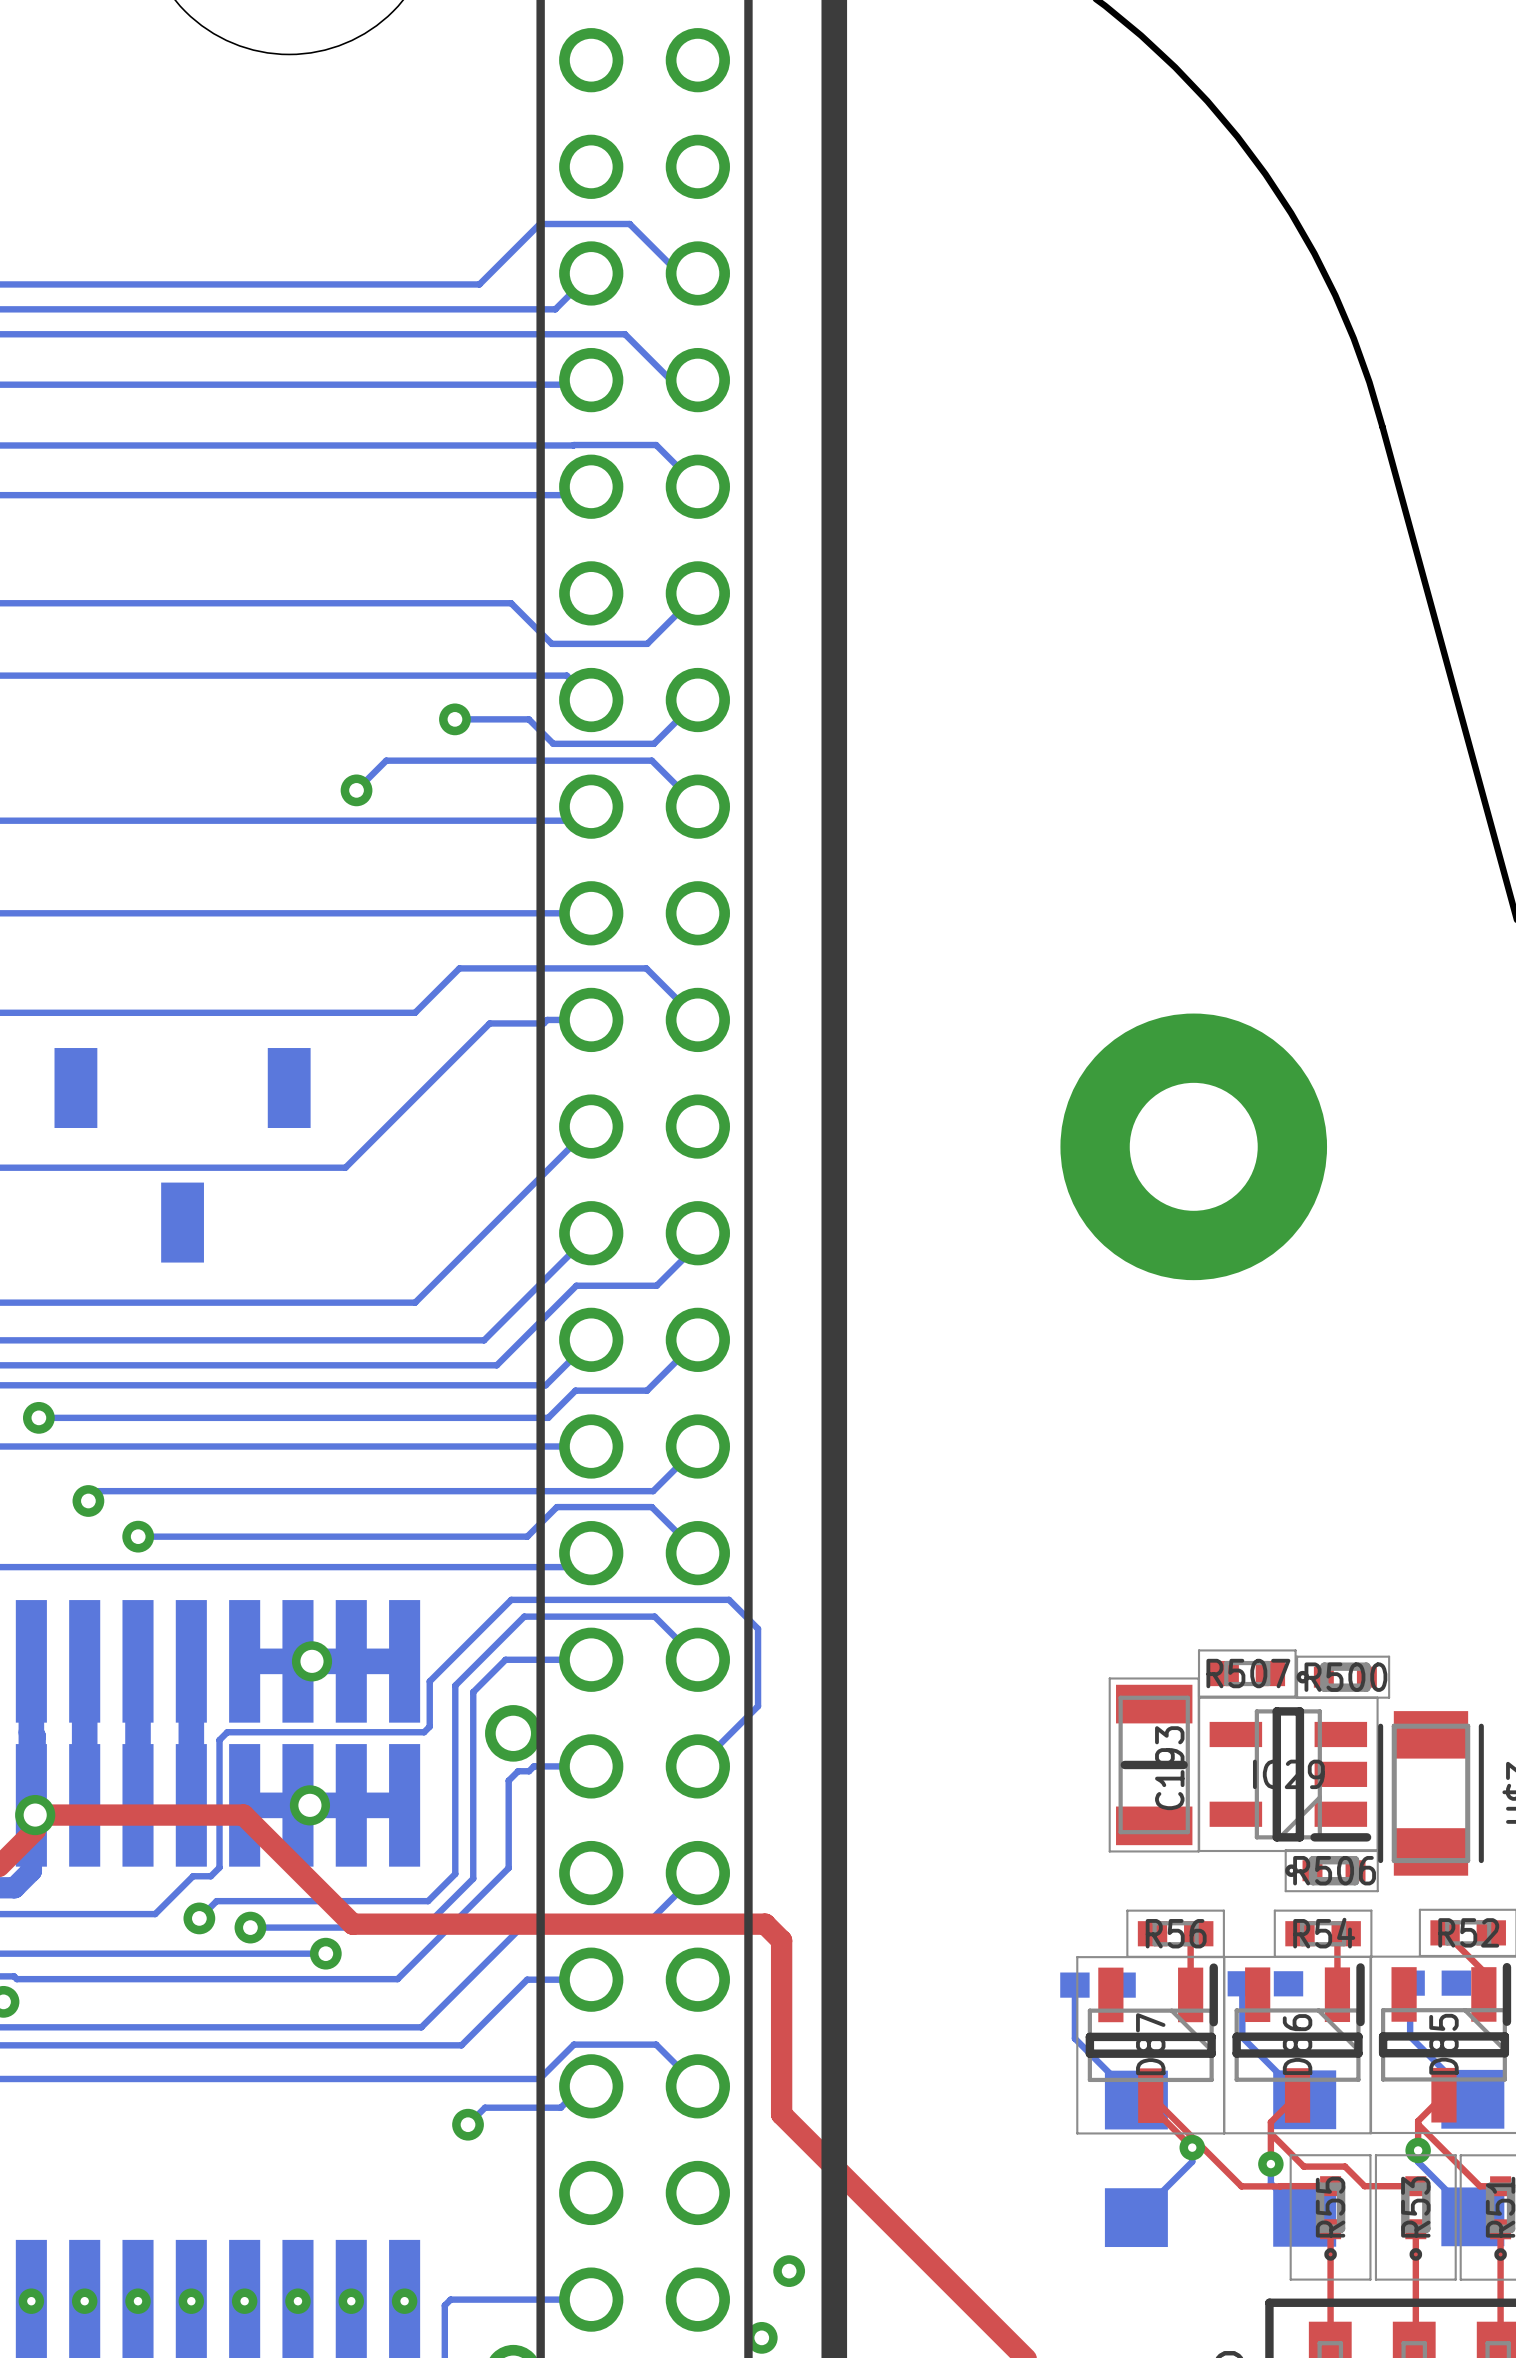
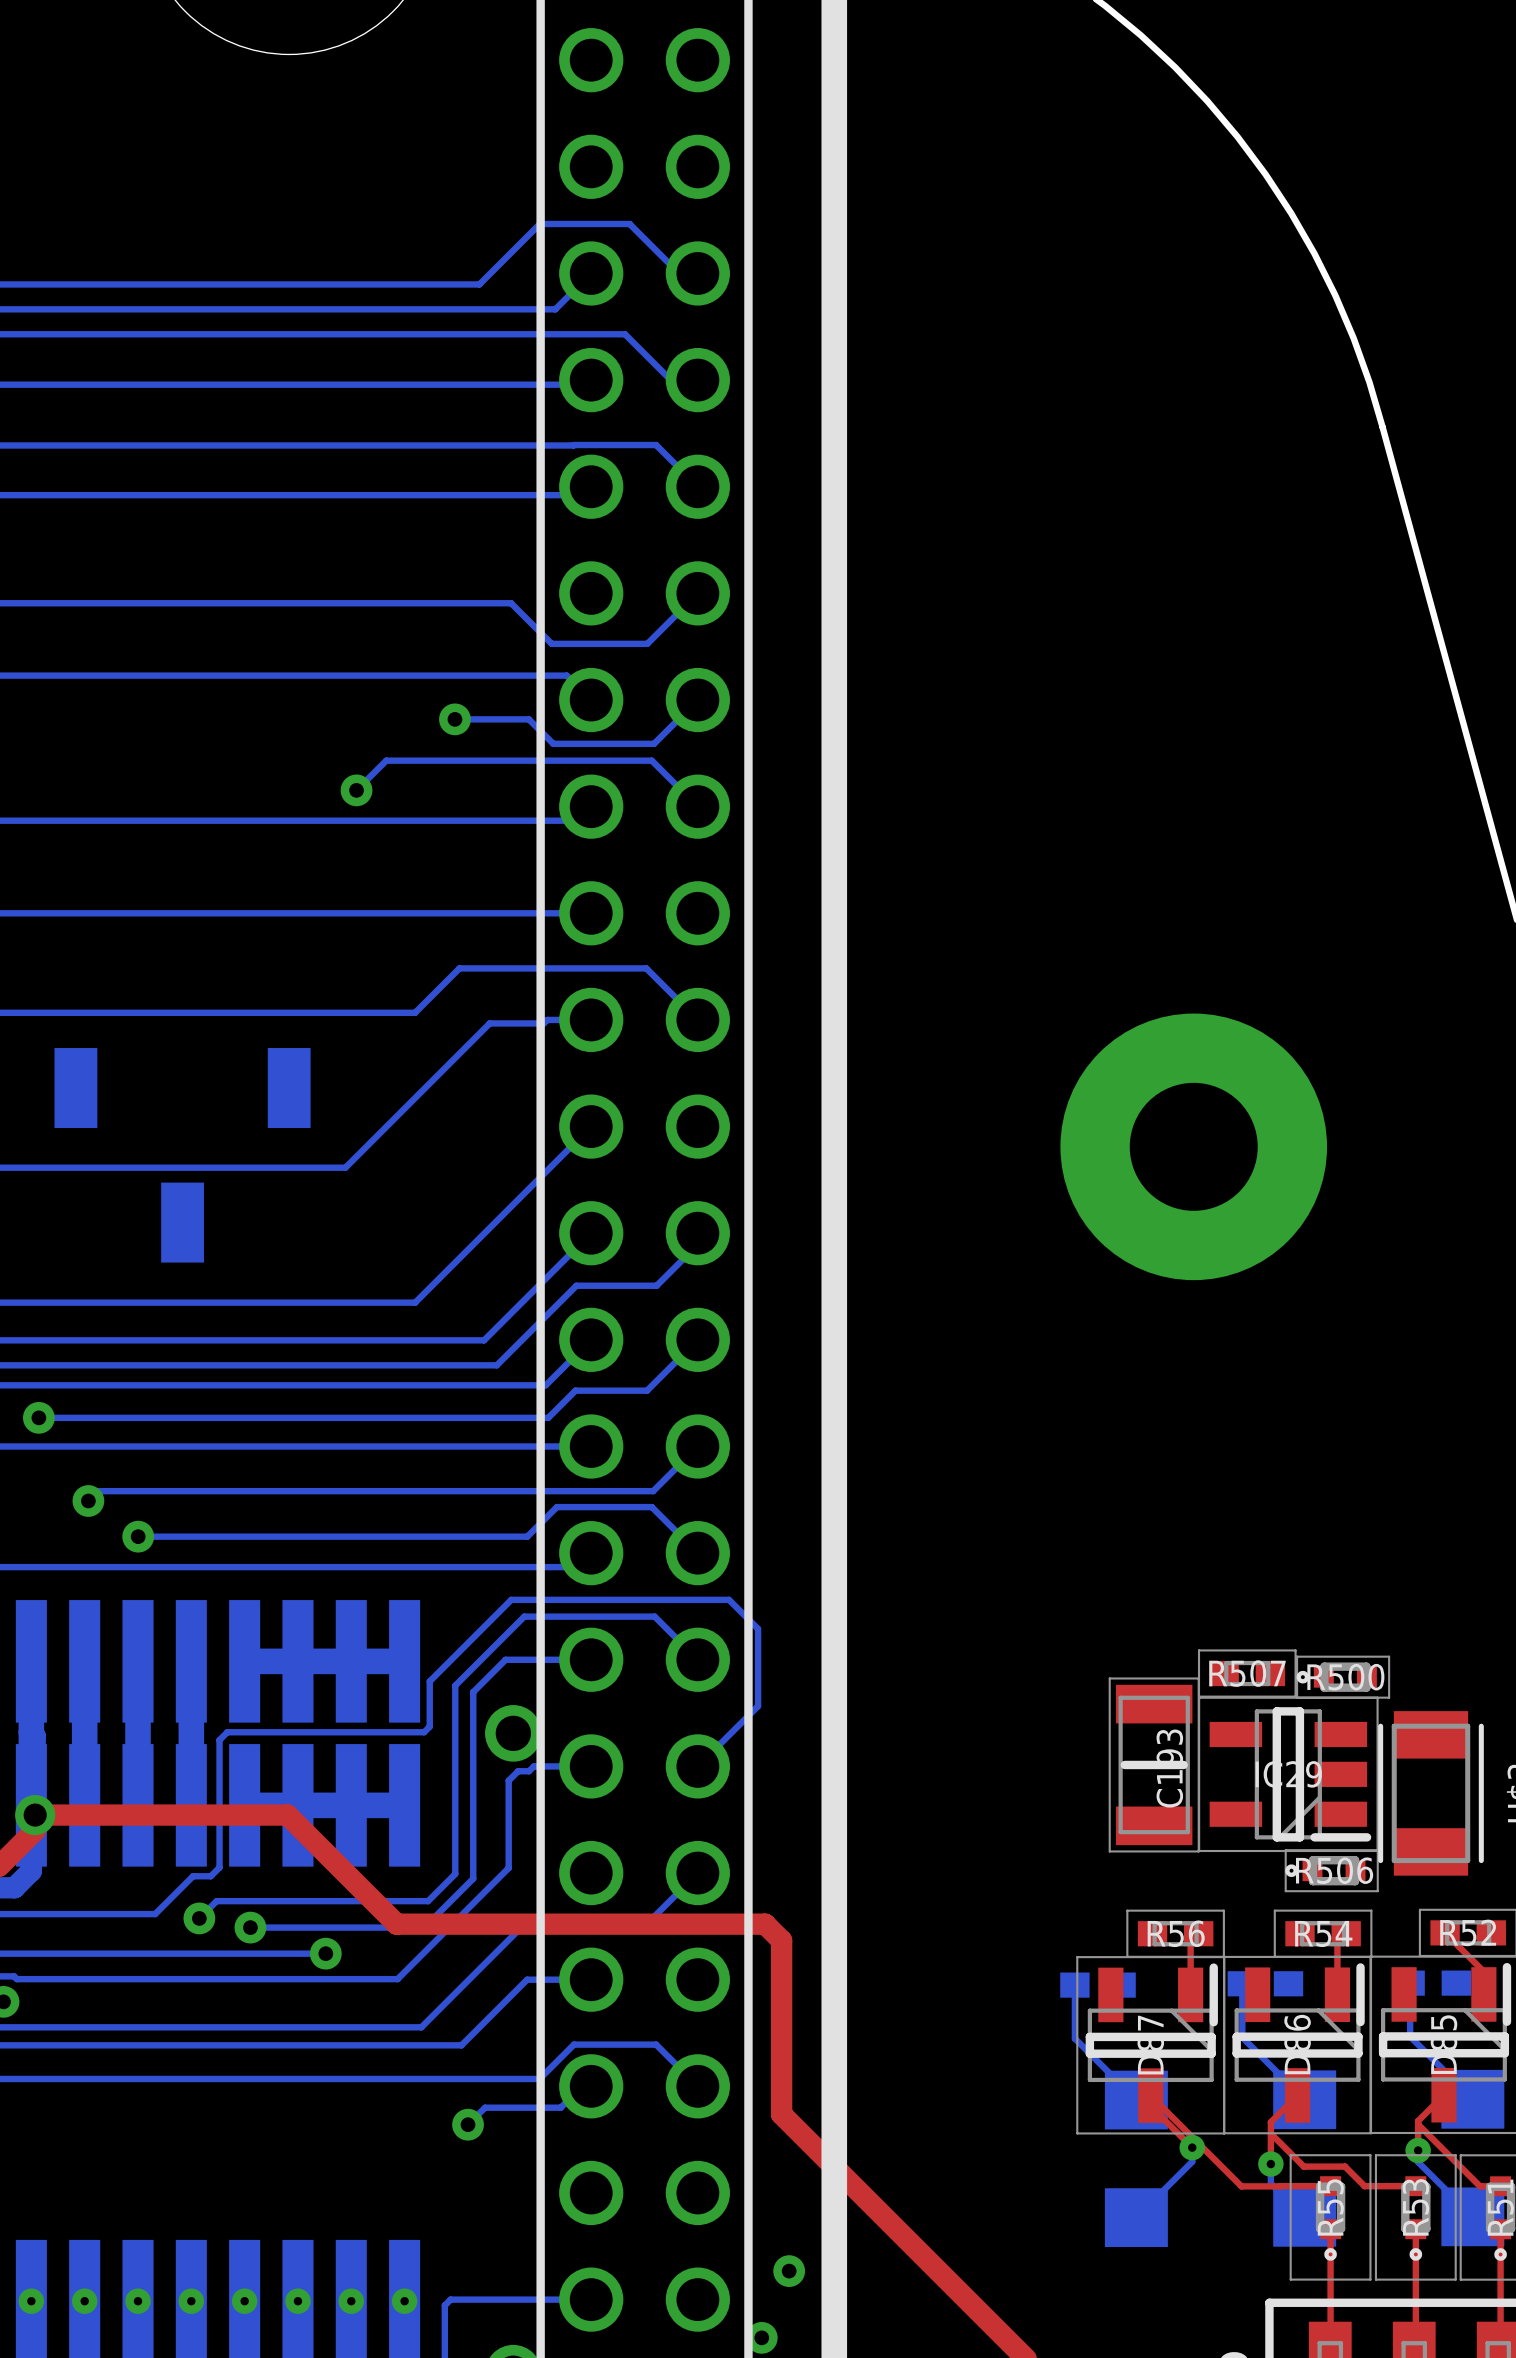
via: (312, 1661) -> none
via: (309, 1805) -> none
top track: (243, 1815) (352, 1924) (396, 1924) -> (243, 1815) (287, 1815) (396, 1924)

